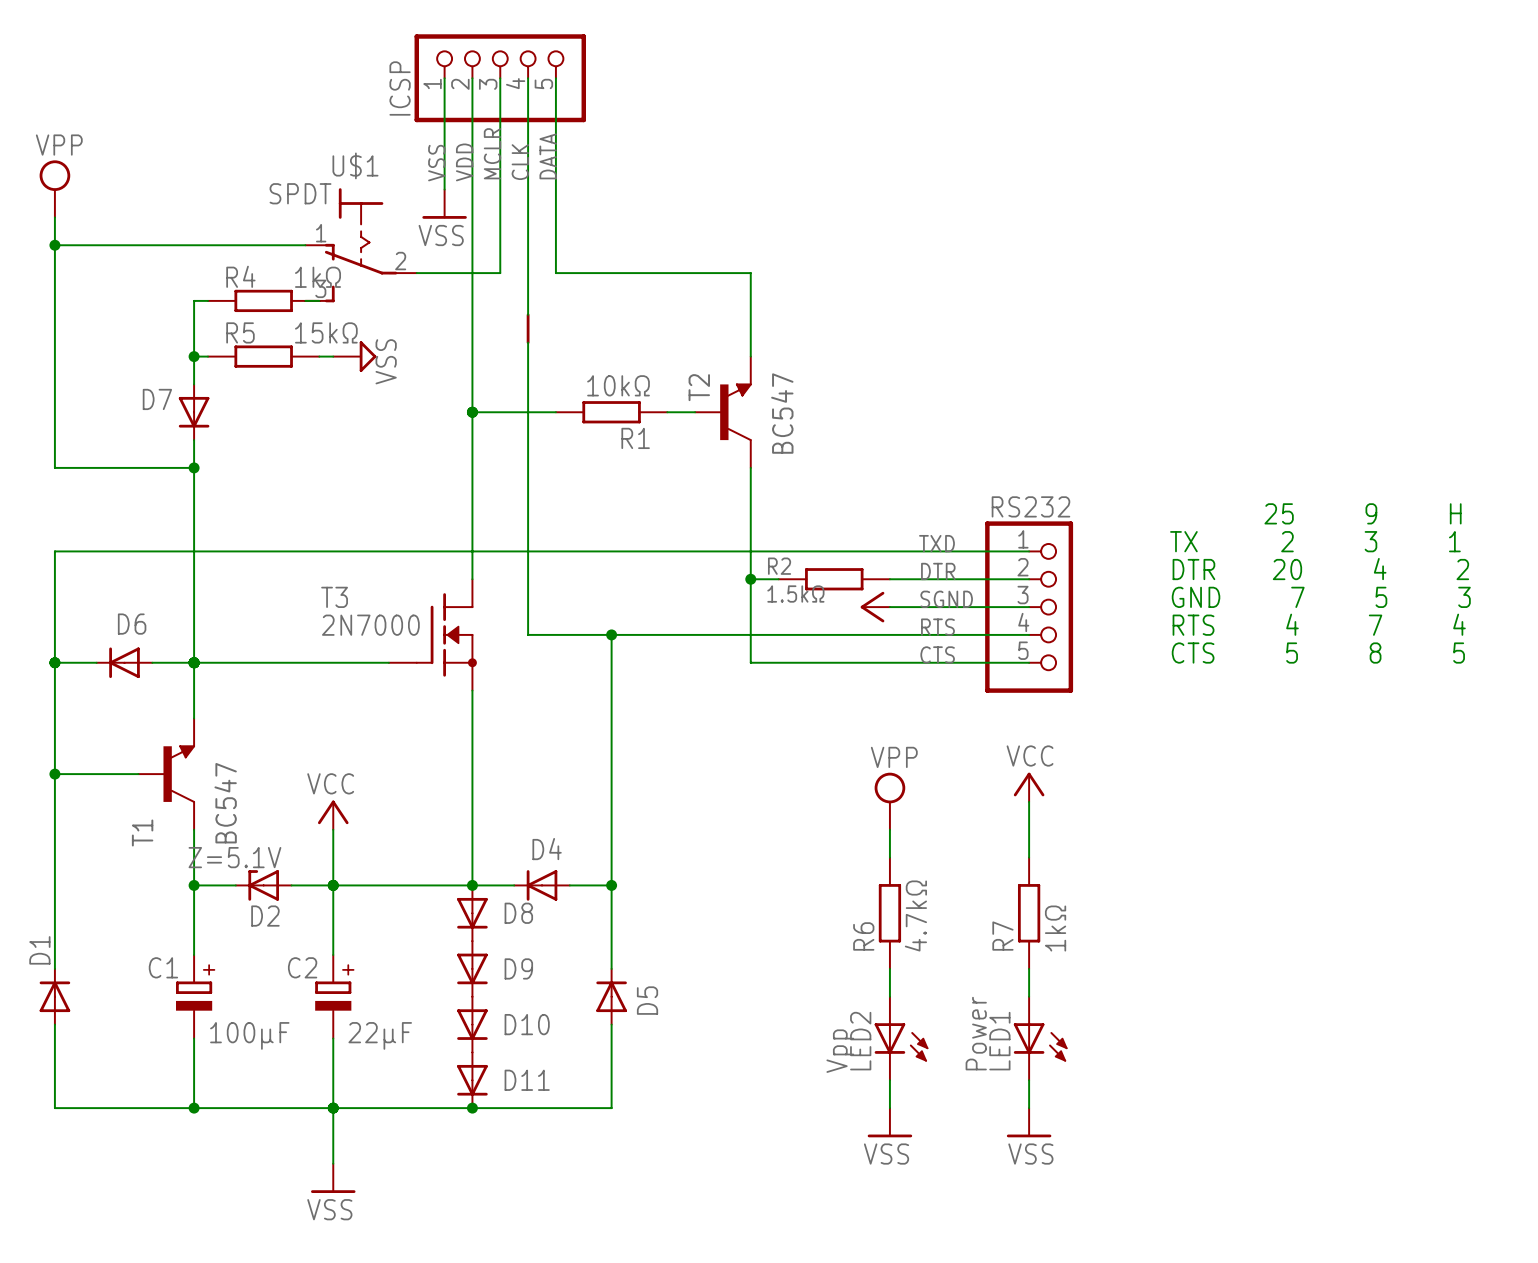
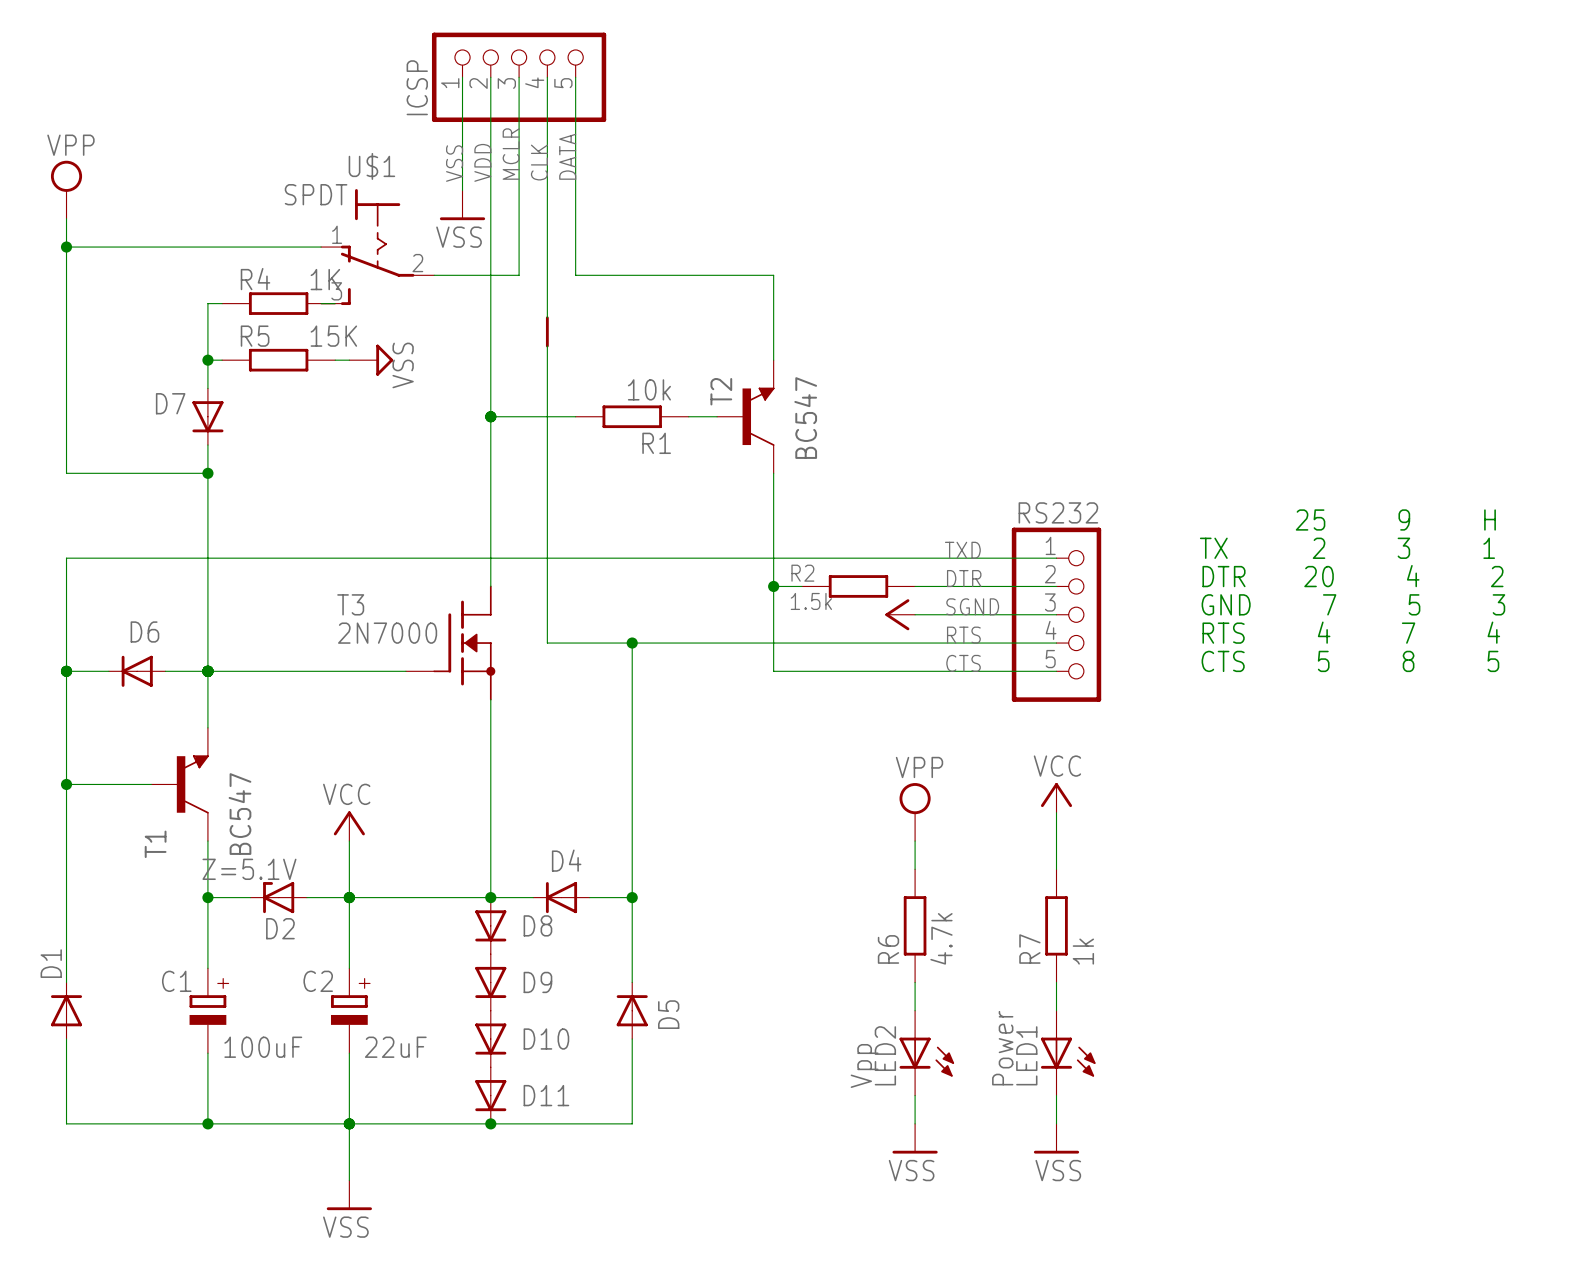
R4 value: 1kΩ (318, 277) -> 1K (325, 279)
R5 value: 15kΩ (326, 332) -> 15K (333, 336)
R1 value: 10kΩ (618, 385) -> 10k (649, 389)
R2 value: 1.5kΩ (795, 594) -> 1.5k (811, 601)
R6 value: 4.7kΩ (915, 916) -> 4.7k (941, 938)
R7 value: 1kΩ (1055, 928) -> 1k (1083, 951)
C1 value: 100μF (249, 1035) -> 100uF (263, 1047)
C2 value: 22μF (380, 1035) -> 22uF (395, 1047)

